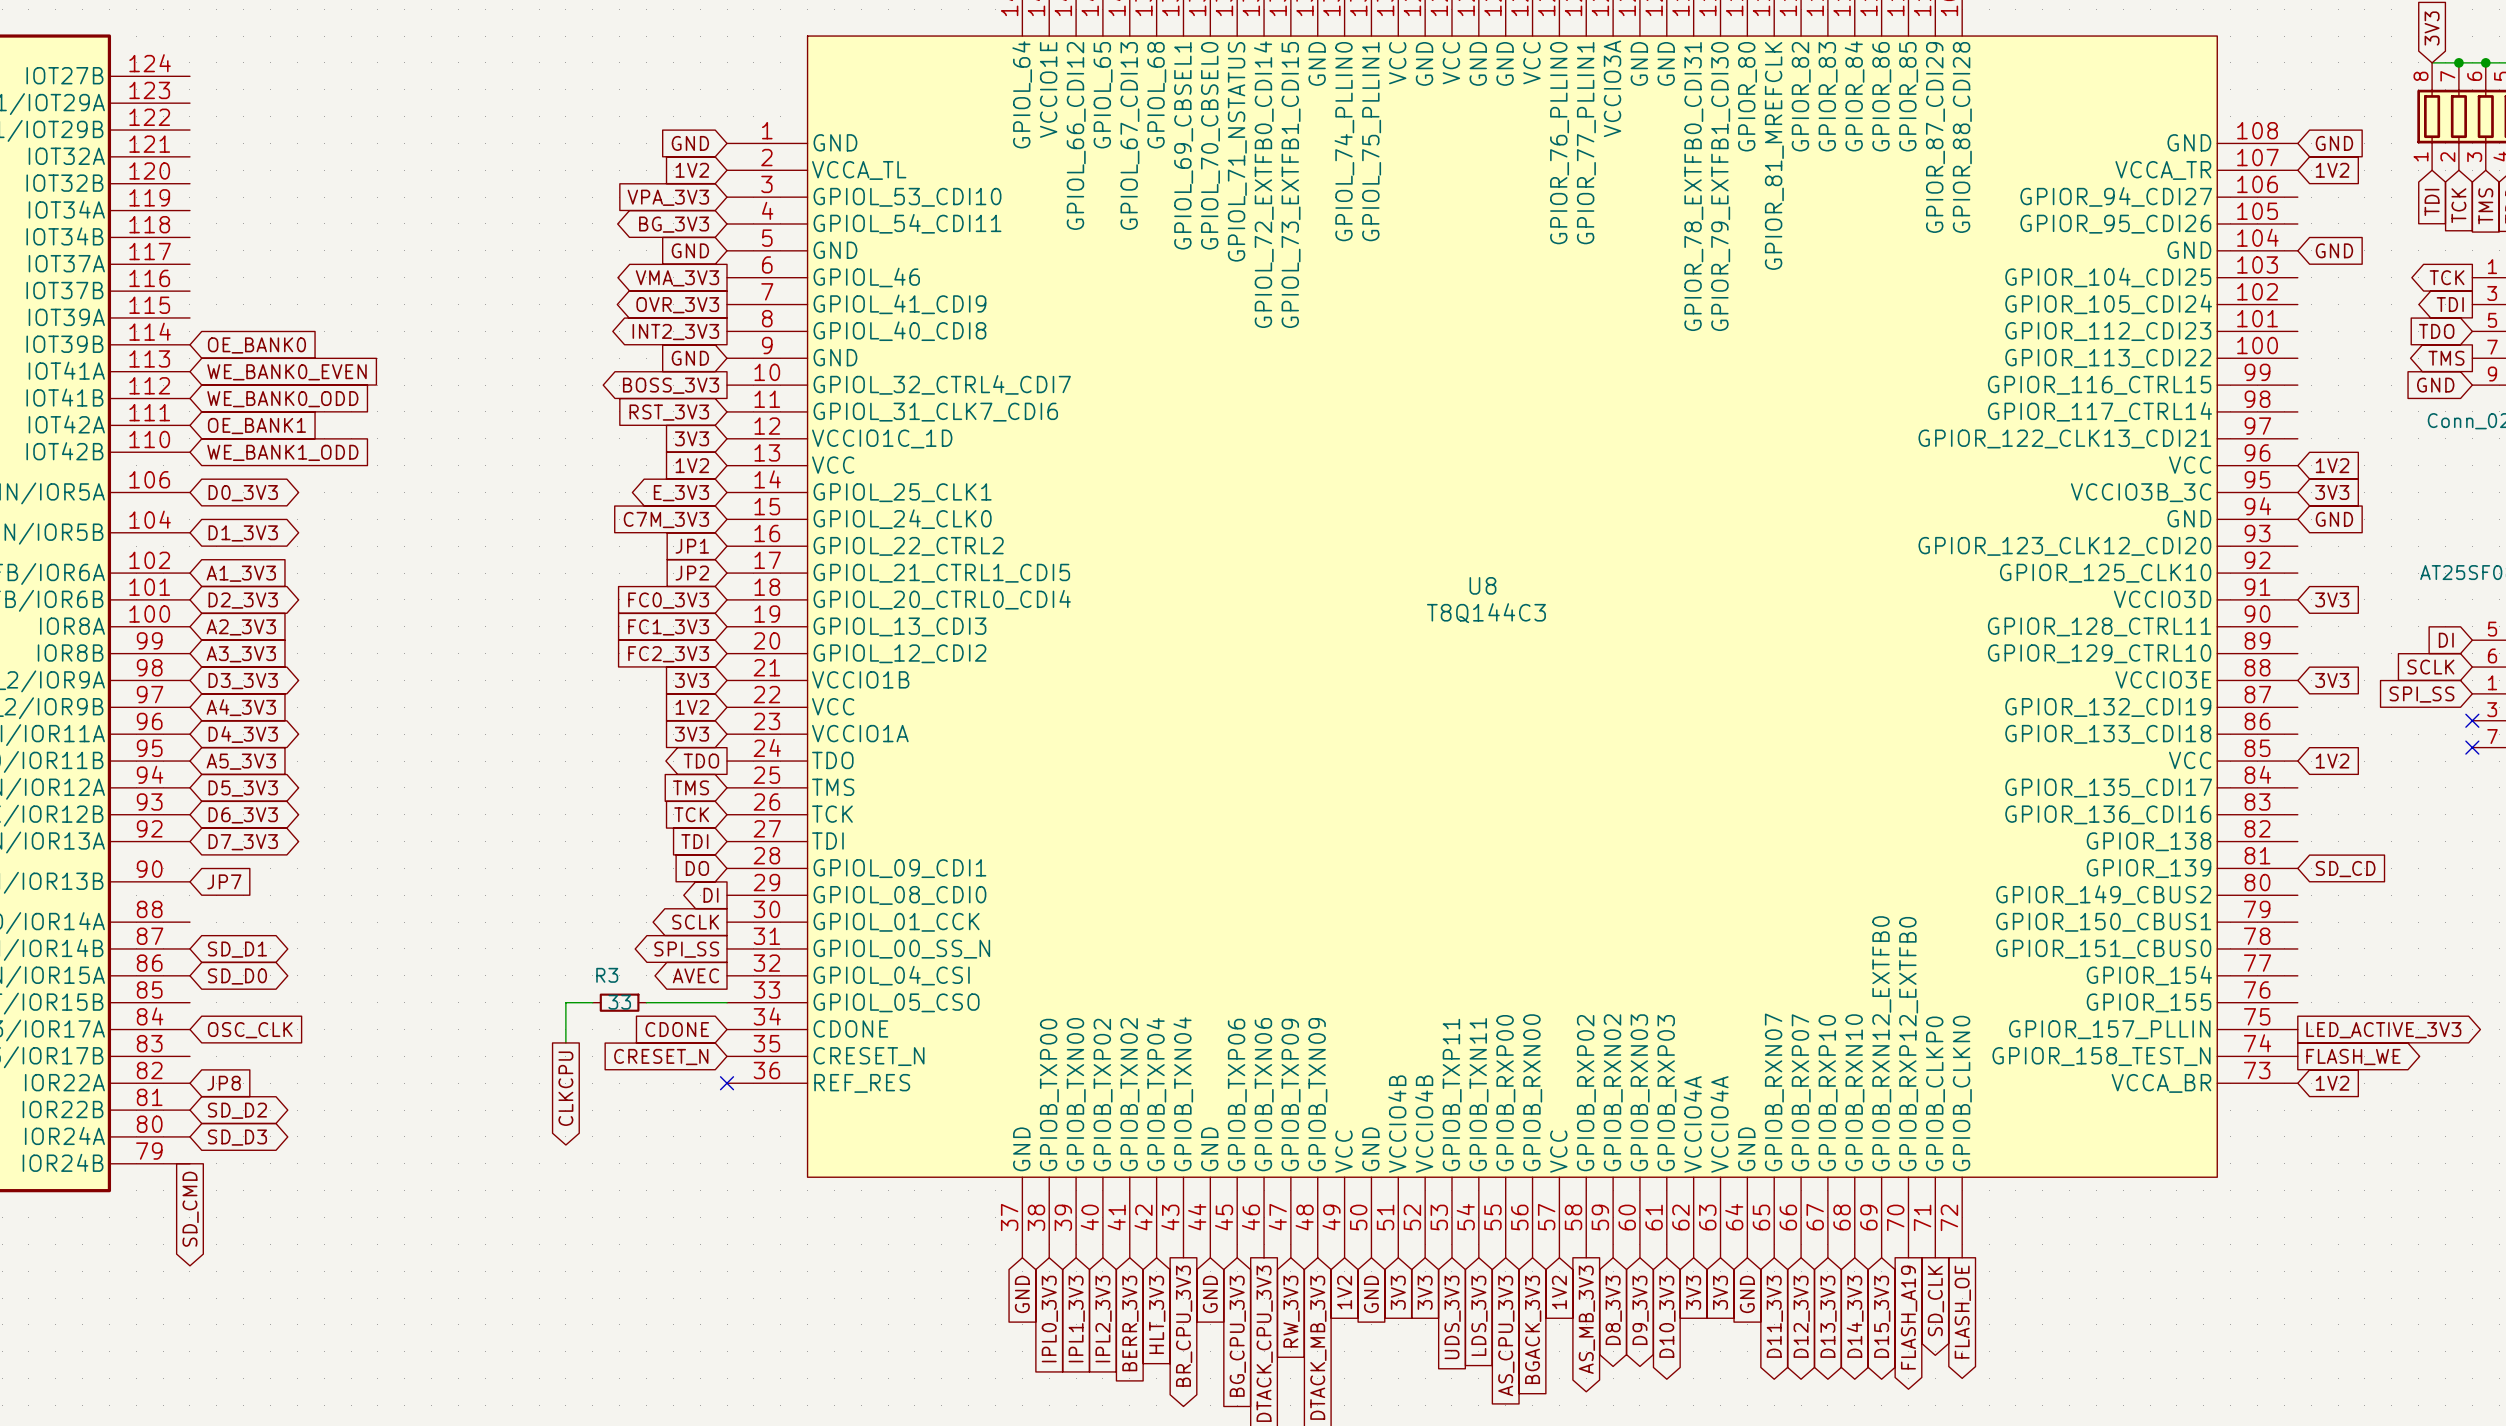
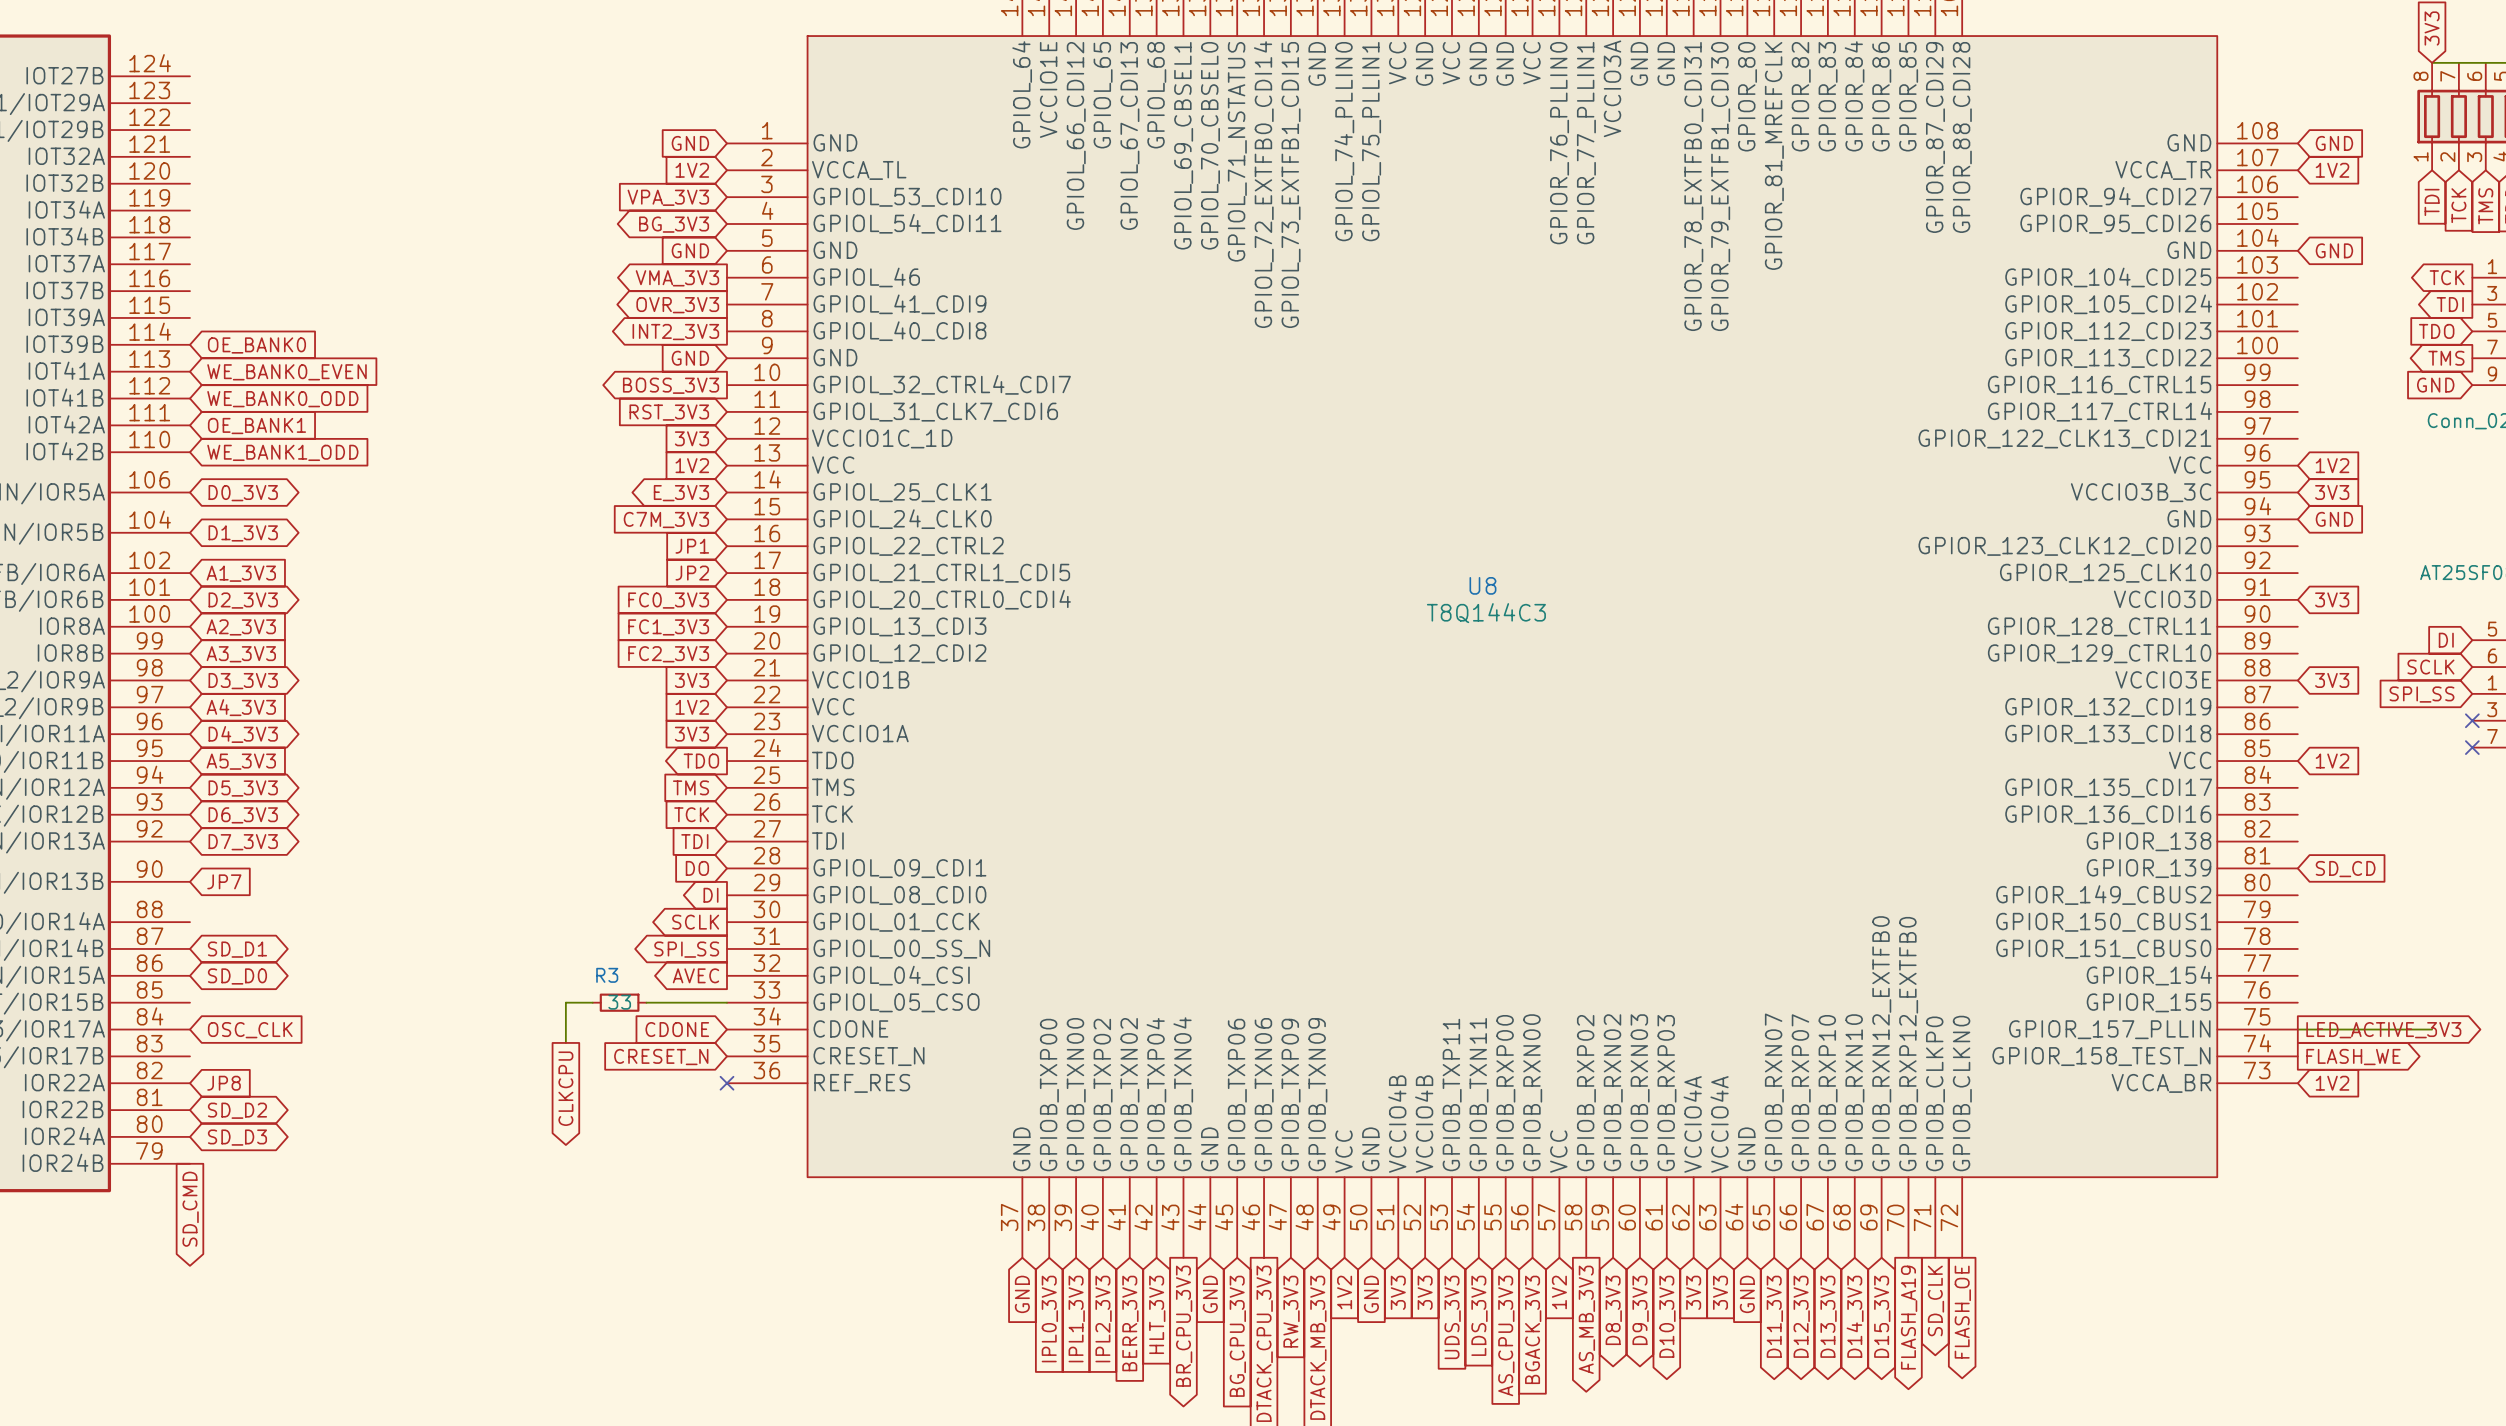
junction: (2458, 62) -> none
junction: (2485, 62) -> none
wire: none -> (2297, 1029) (2432, 1029)

